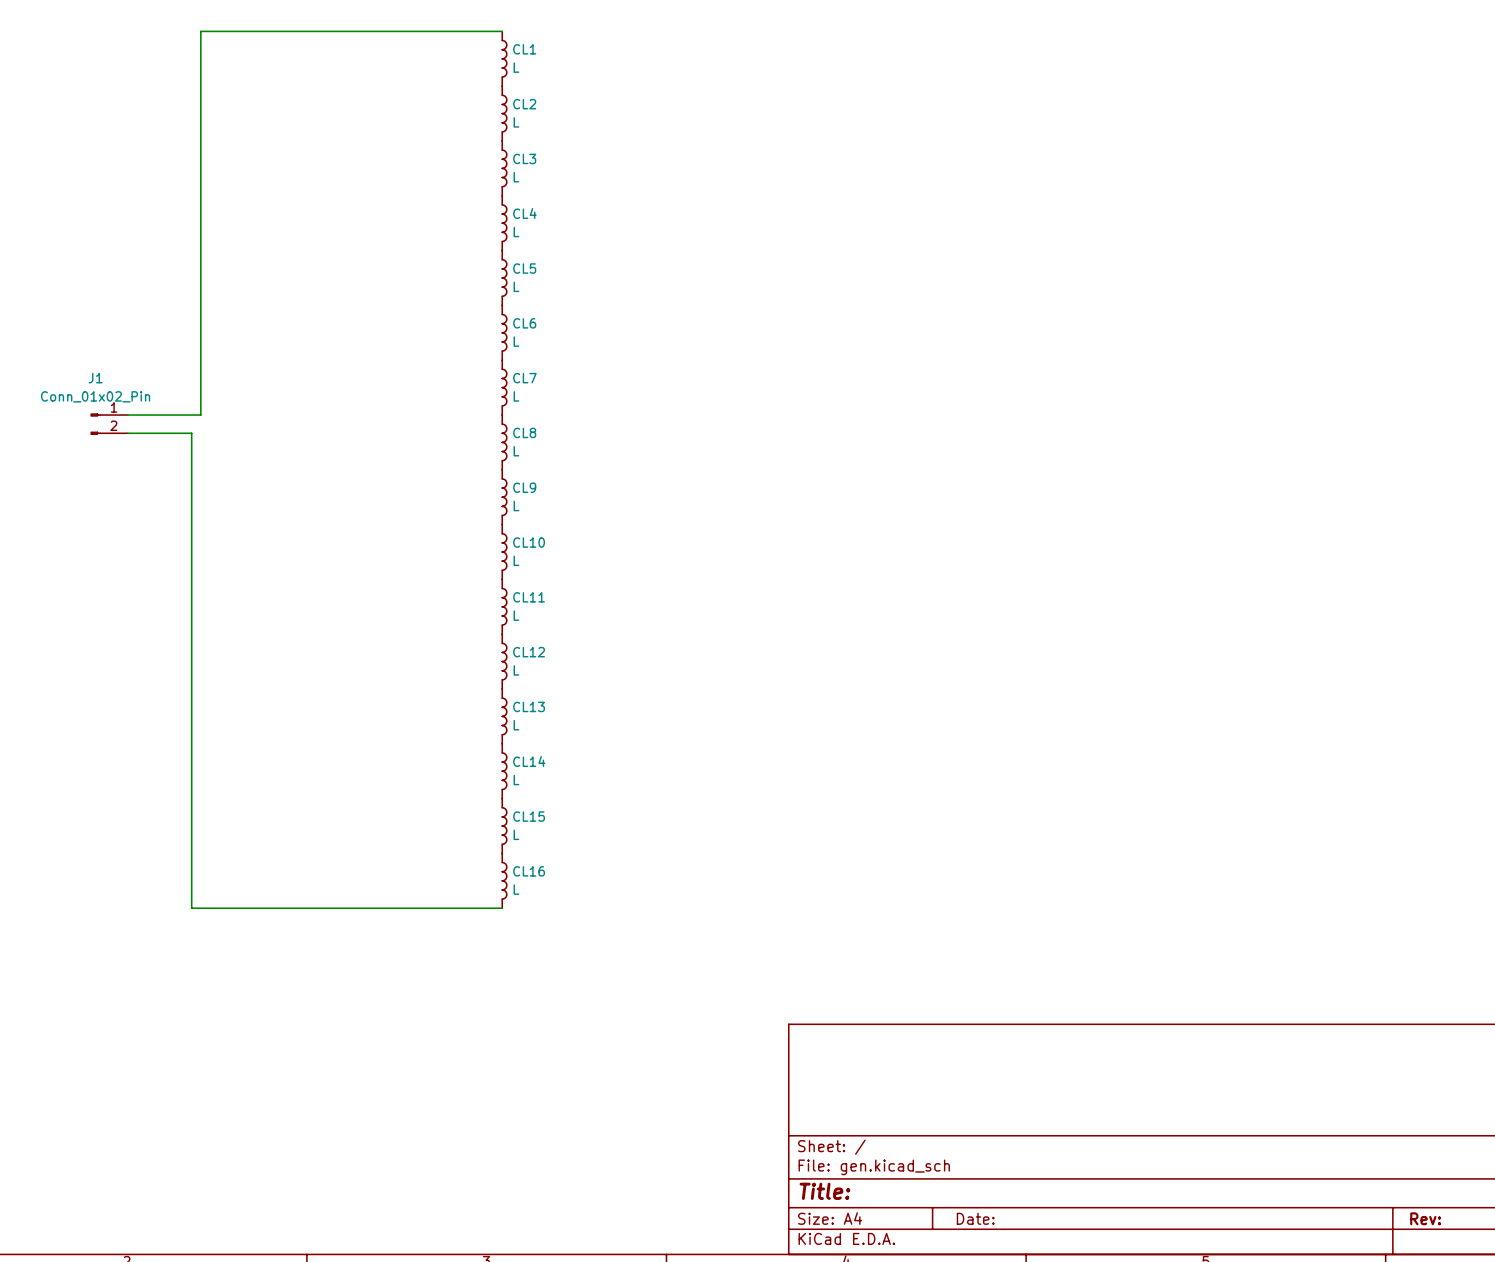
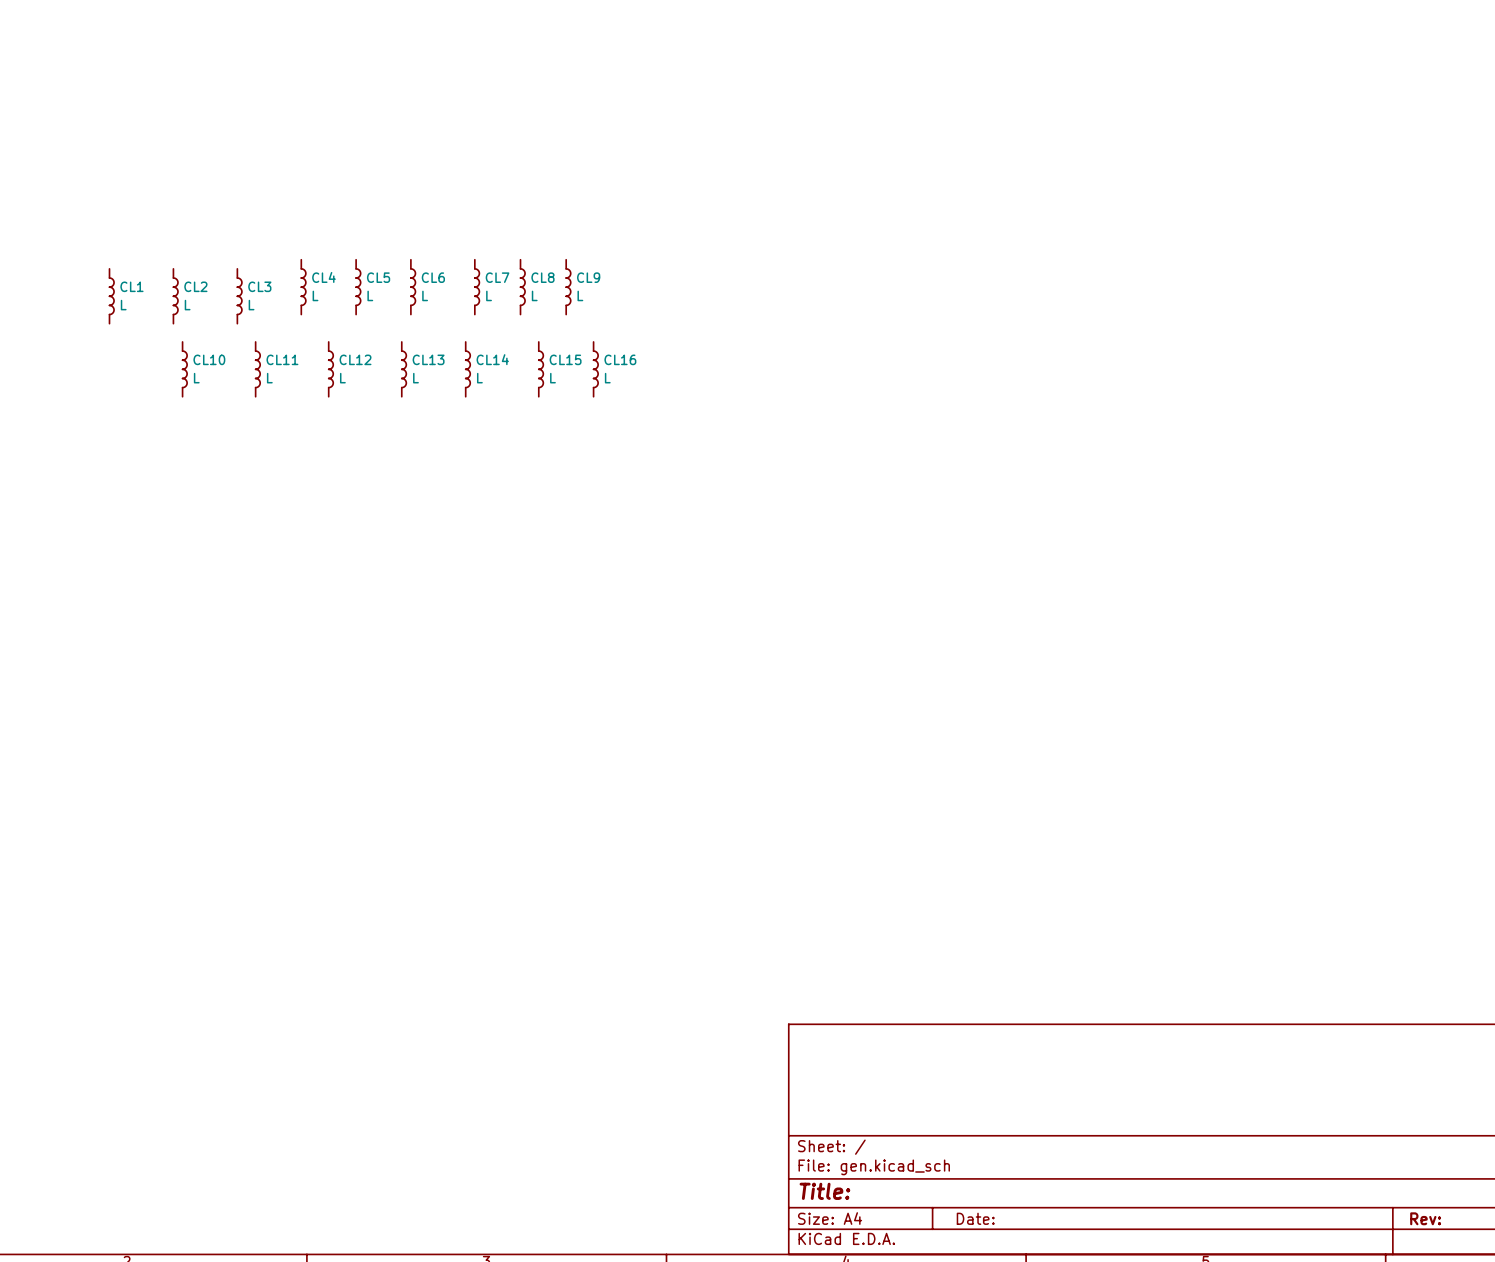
wire: (502, 31) (200, 31) (200, 415) (127, 415) -> none
CL1 position: (504, 58) -> (111, 296)
CL2 position: (504, 113) -> (175, 296)
CL3 position: (504, 168) -> (239, 296)
CL4 position: (504, 223) -> (303, 287)
CL5 position: (504, 278) -> (358, 287)
CL6 position: (504, 332) -> (413, 287)
CL7 position: (504, 387) -> (477, 287)
J1: Conn_01x02_Pin (109, 424) -> none
wire: (127, 433) (191, 433) (191, 908) (502, 908) -> none
CL8 position: (504, 442) -> (522, 287)
CL9 position: (504, 497) -> (568, 287)
CL10 position: (504, 552) -> (184, 369)
CL11 position: (504, 606) -> (257, 369)
CL12 position: (504, 661) -> (330, 369)
CL13 position: (504, 716) -> (404, 369)
CL14 position: (504, 771) -> (467, 369)
CL15 position: (504, 826) -> (541, 369)
CL16 position: (504, 880) -> (595, 369)

